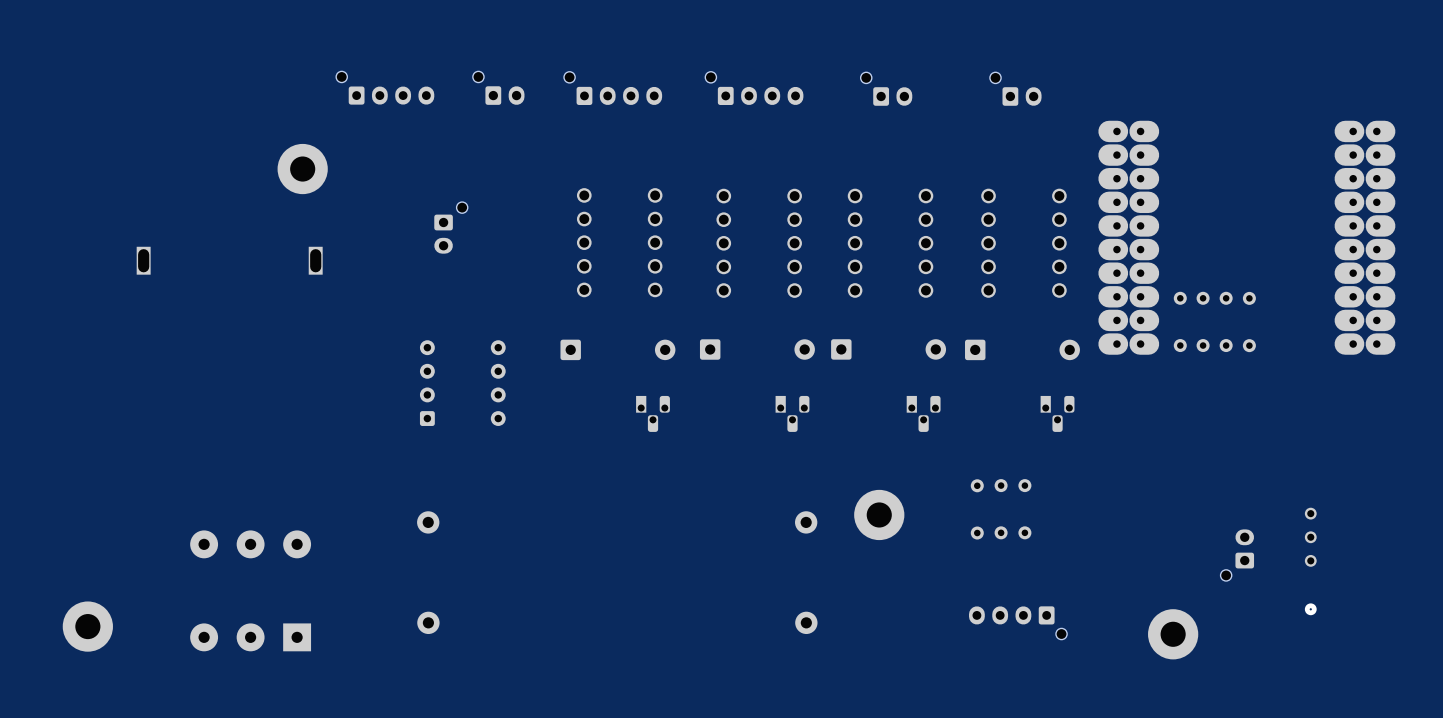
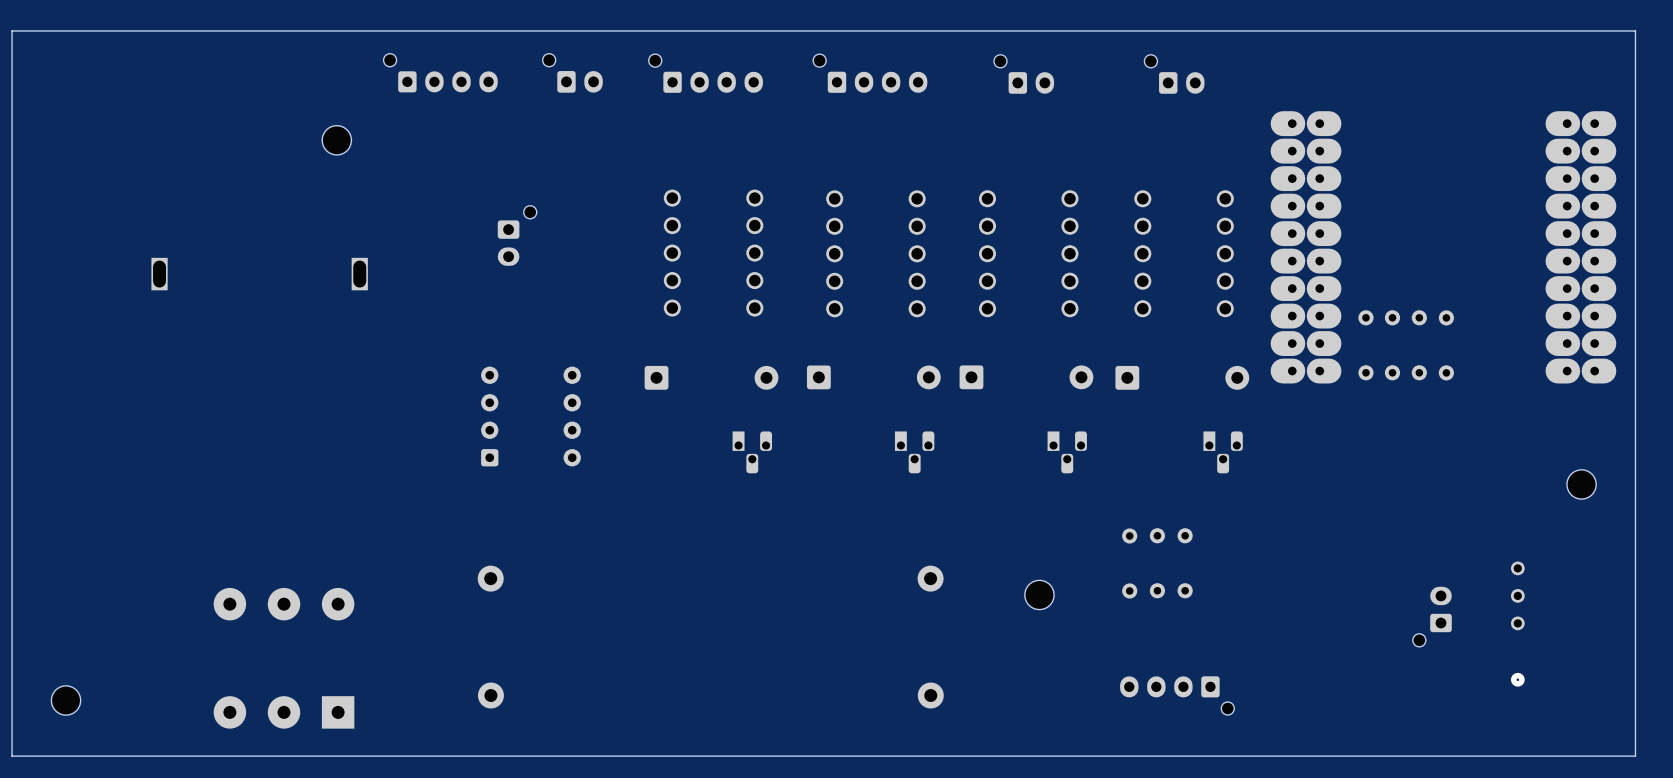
board edge: none -> (1635, 30) (12, 30) (12, 756) (1635, 756) (1635, 30)
part: none -> (336, 140)
part: (302, 169) -> none
part: none -> (1581, 484)
part: (879, 514) -> none
part: none -> (1039, 594)
part: (87, 626) -> none
part: none -> (66, 700)
part: (1173, 634) -> none

